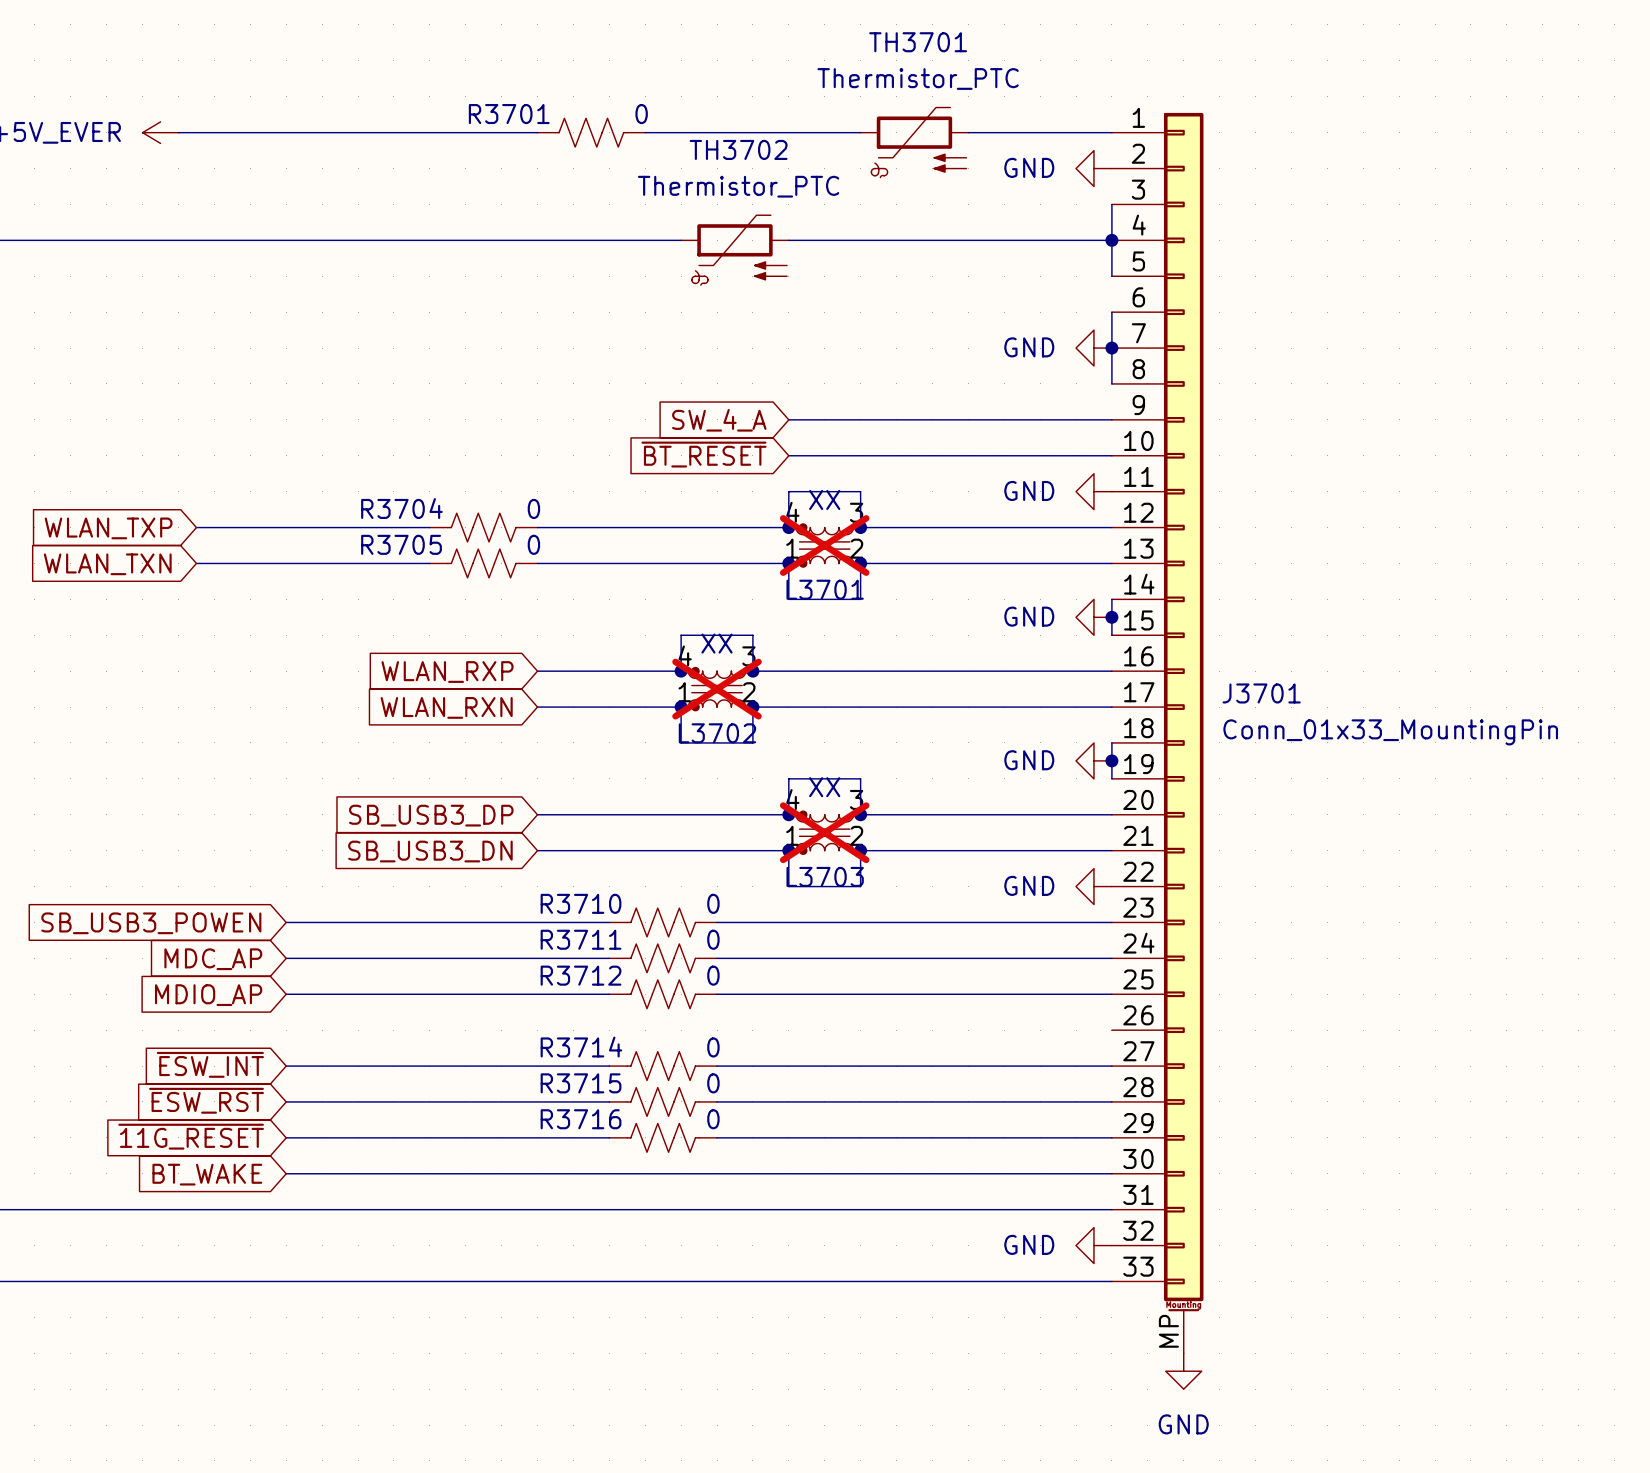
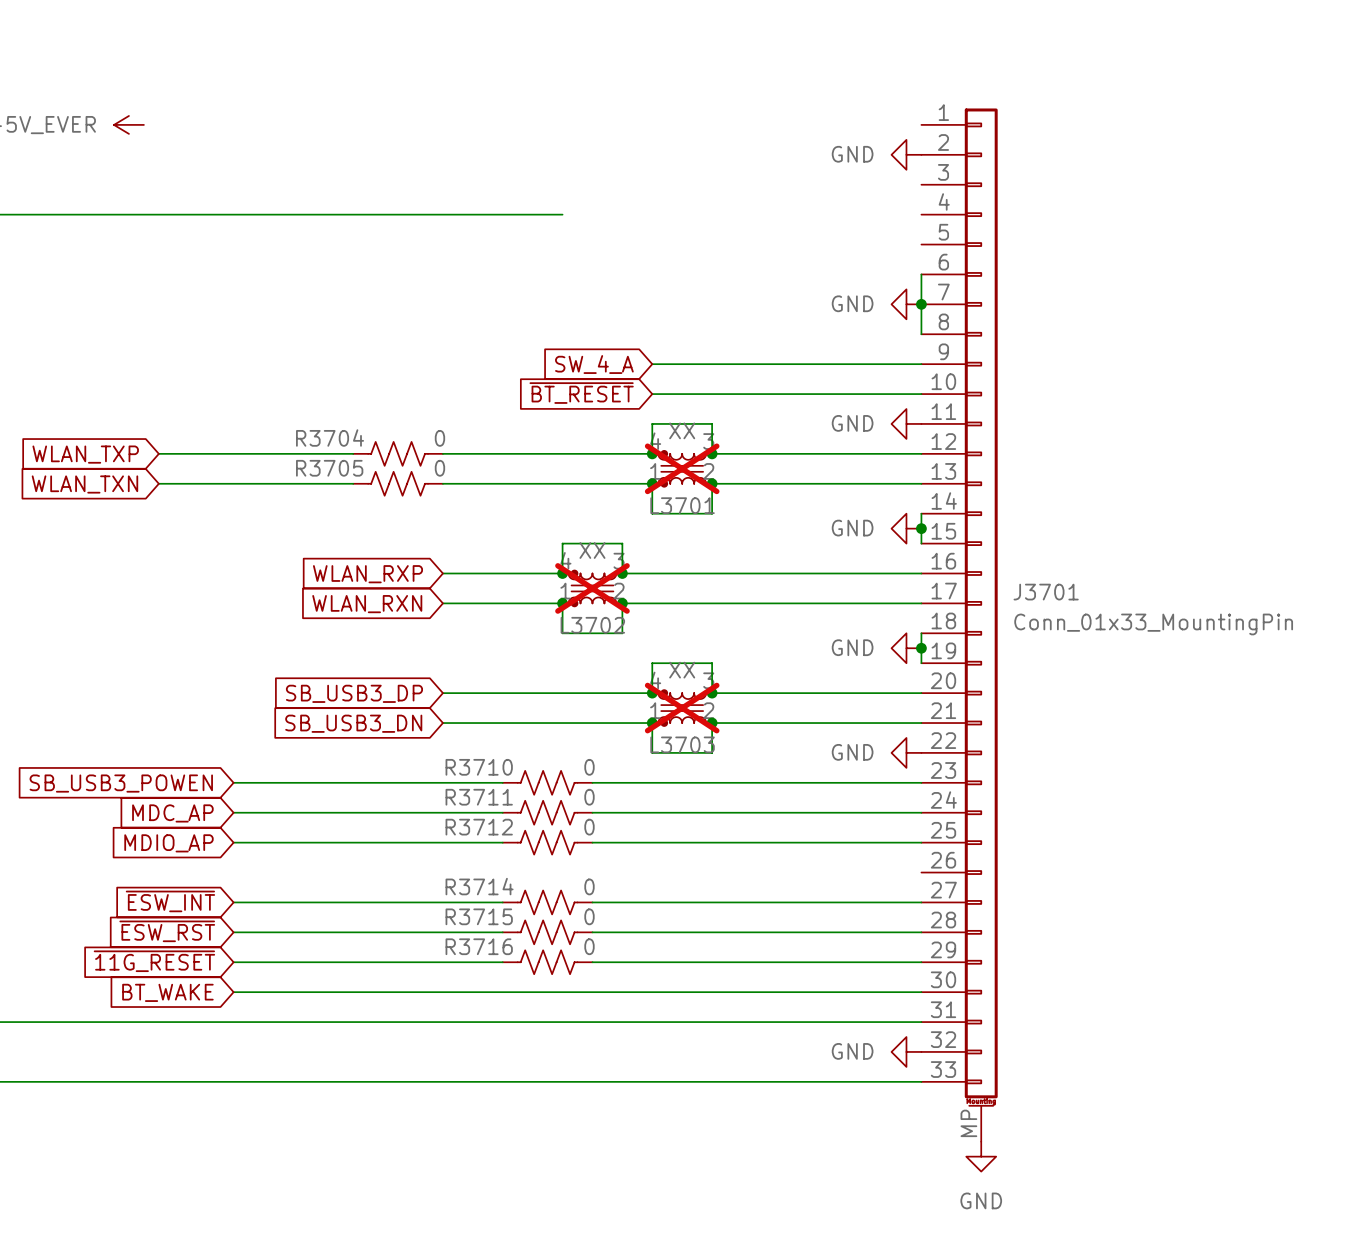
wire: (178, 132) (537, 132) -> none
R3701: 0 (591, 132) -> none
wire: (645, 132) (860, 132) -> none
wire: (968, 132) (1111, 132) -> none
TH3701: Thermistor_PTC (914, 142) -> none
wire: (1111, 204) (1111, 276) -> none
wire: (788, 240) (1111, 240) -> none
junction: (1111, 240) -> none
TH3702: Thermistor_PTC (734, 250) -> none

